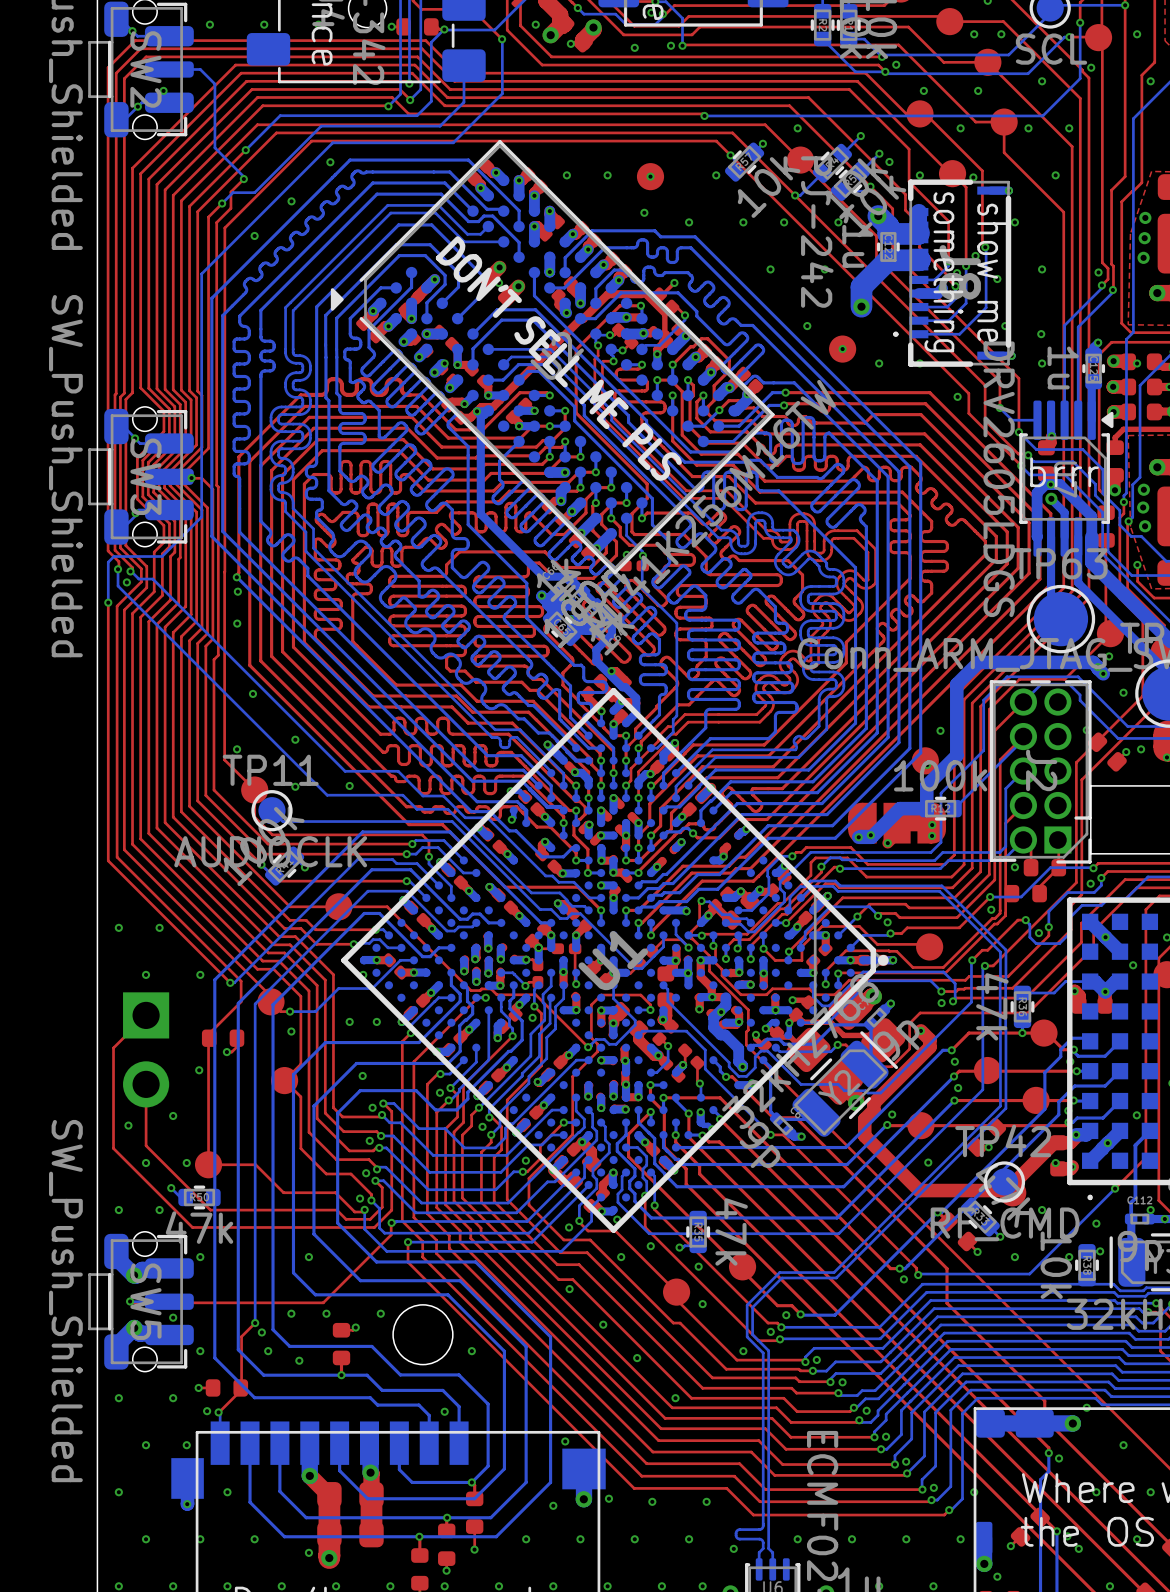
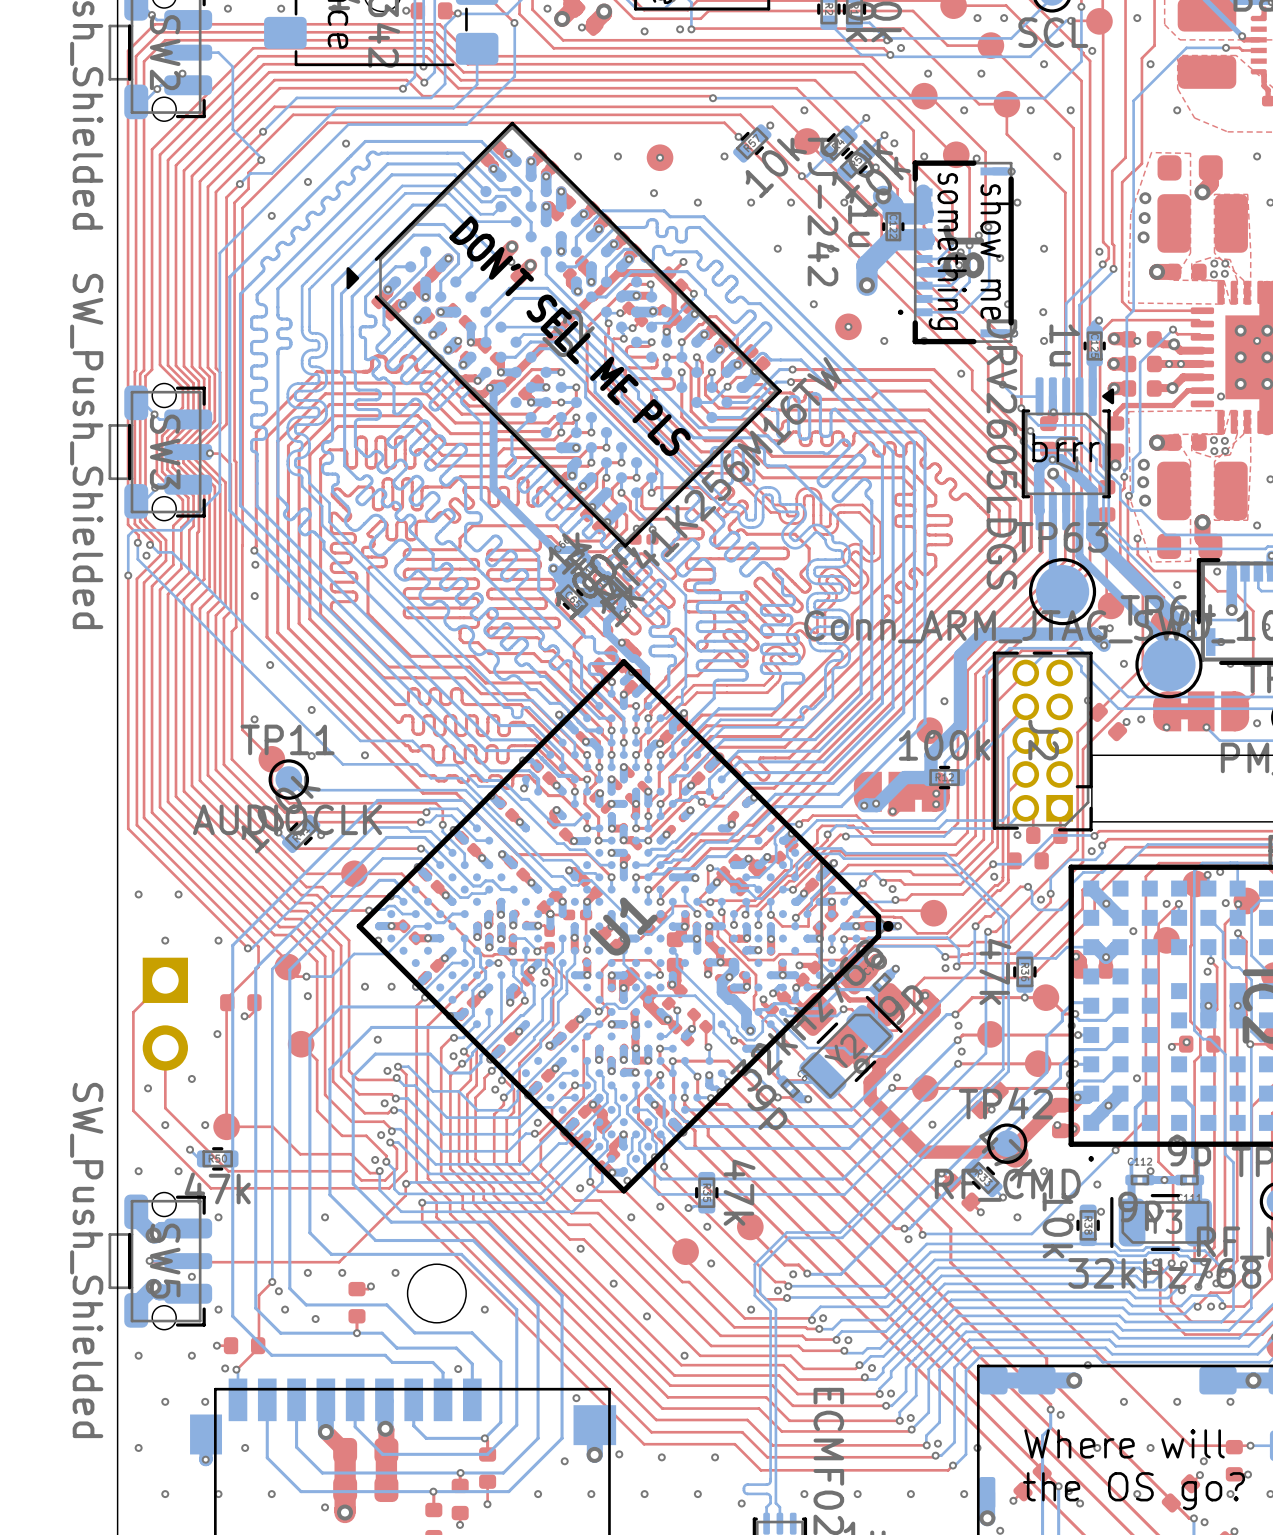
top track: (347, 394) (343, 392) (341, 382) (335, 379) (328, 380) (326, 391) (321, 394) -> (363, 371) (336, 371)

